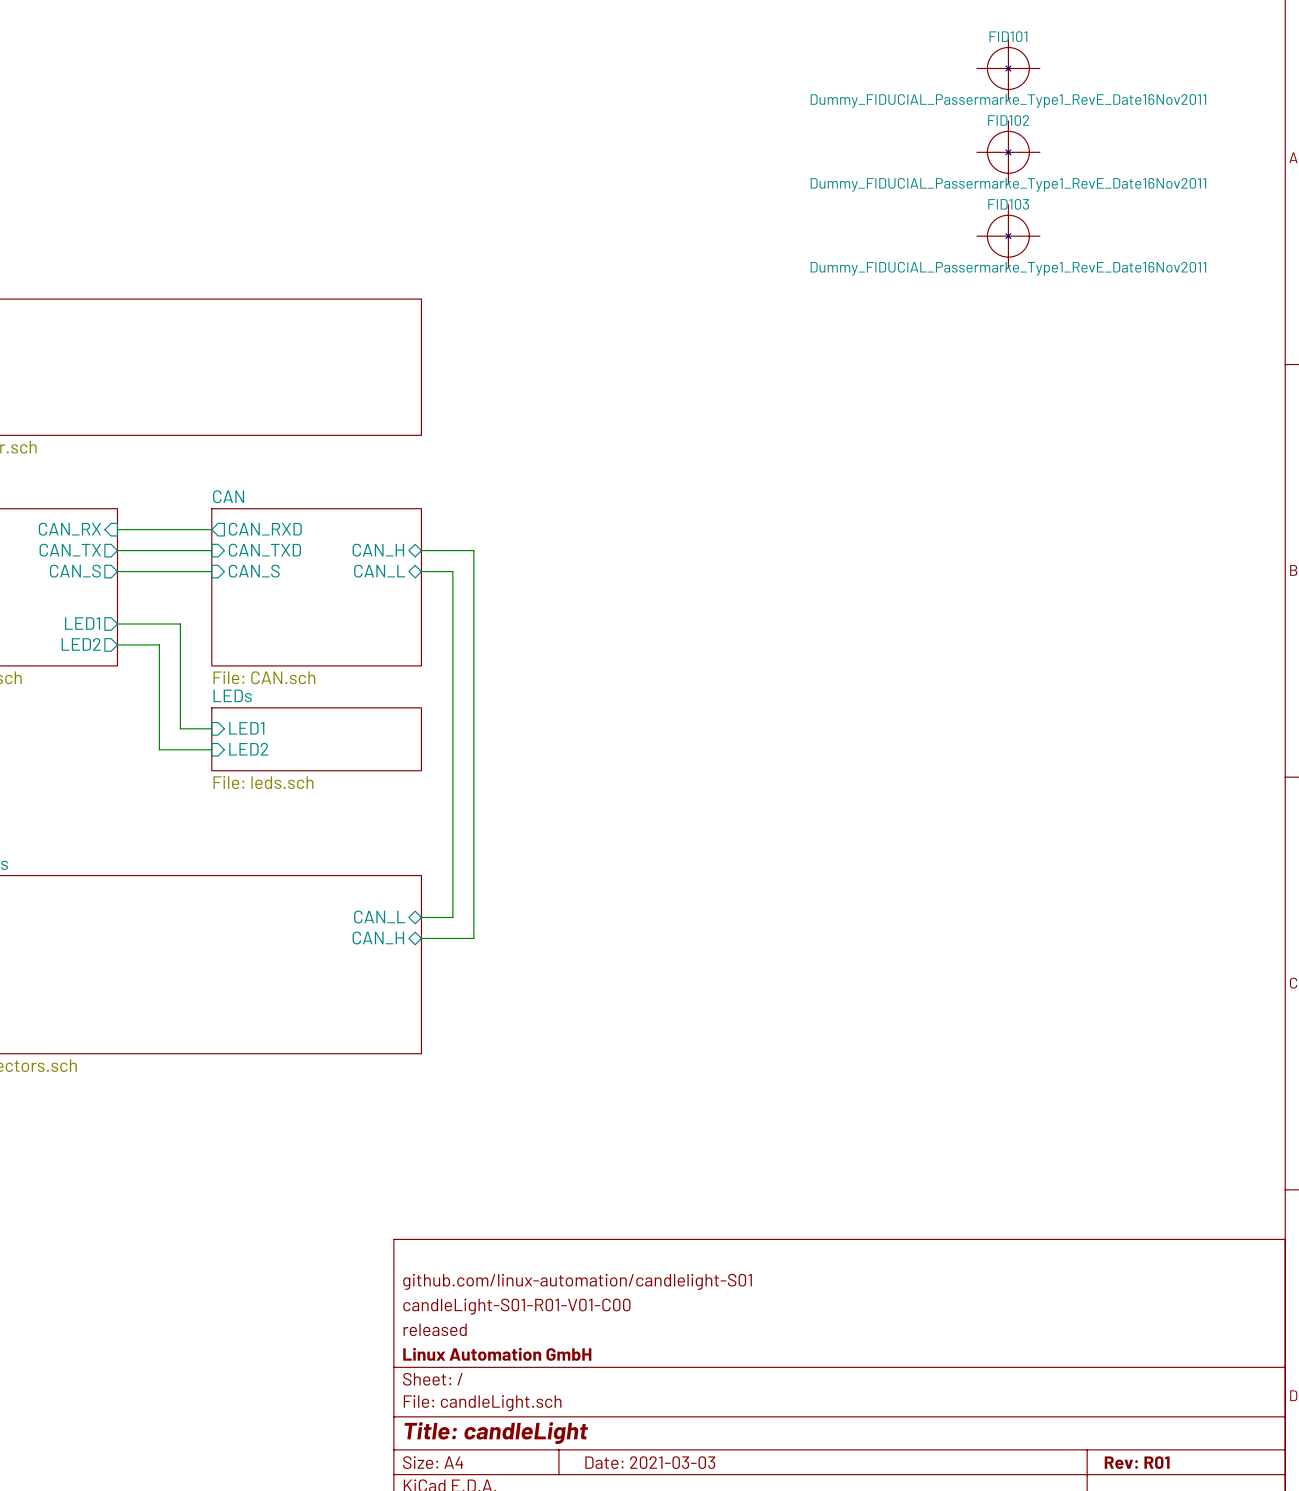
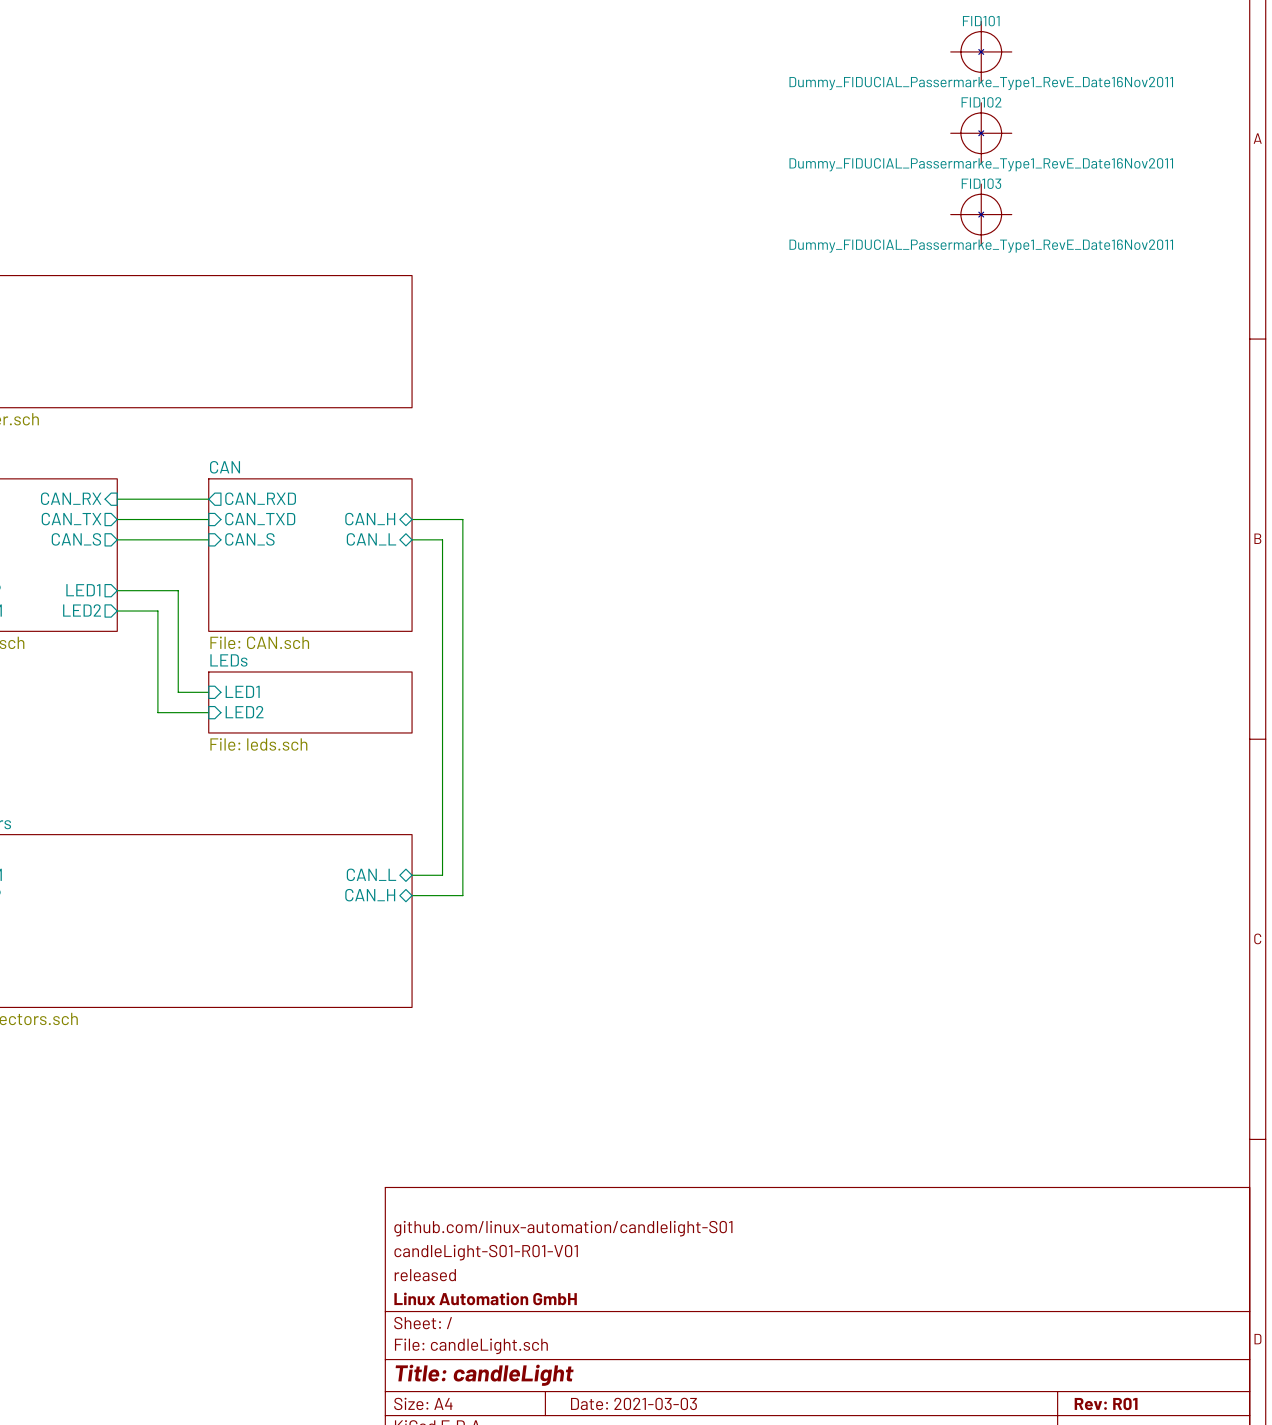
title block: candleLight-S01-R01-V01-C00 (516, 1306) -> candleLight-S01-R01-V01 (486, 1252)

